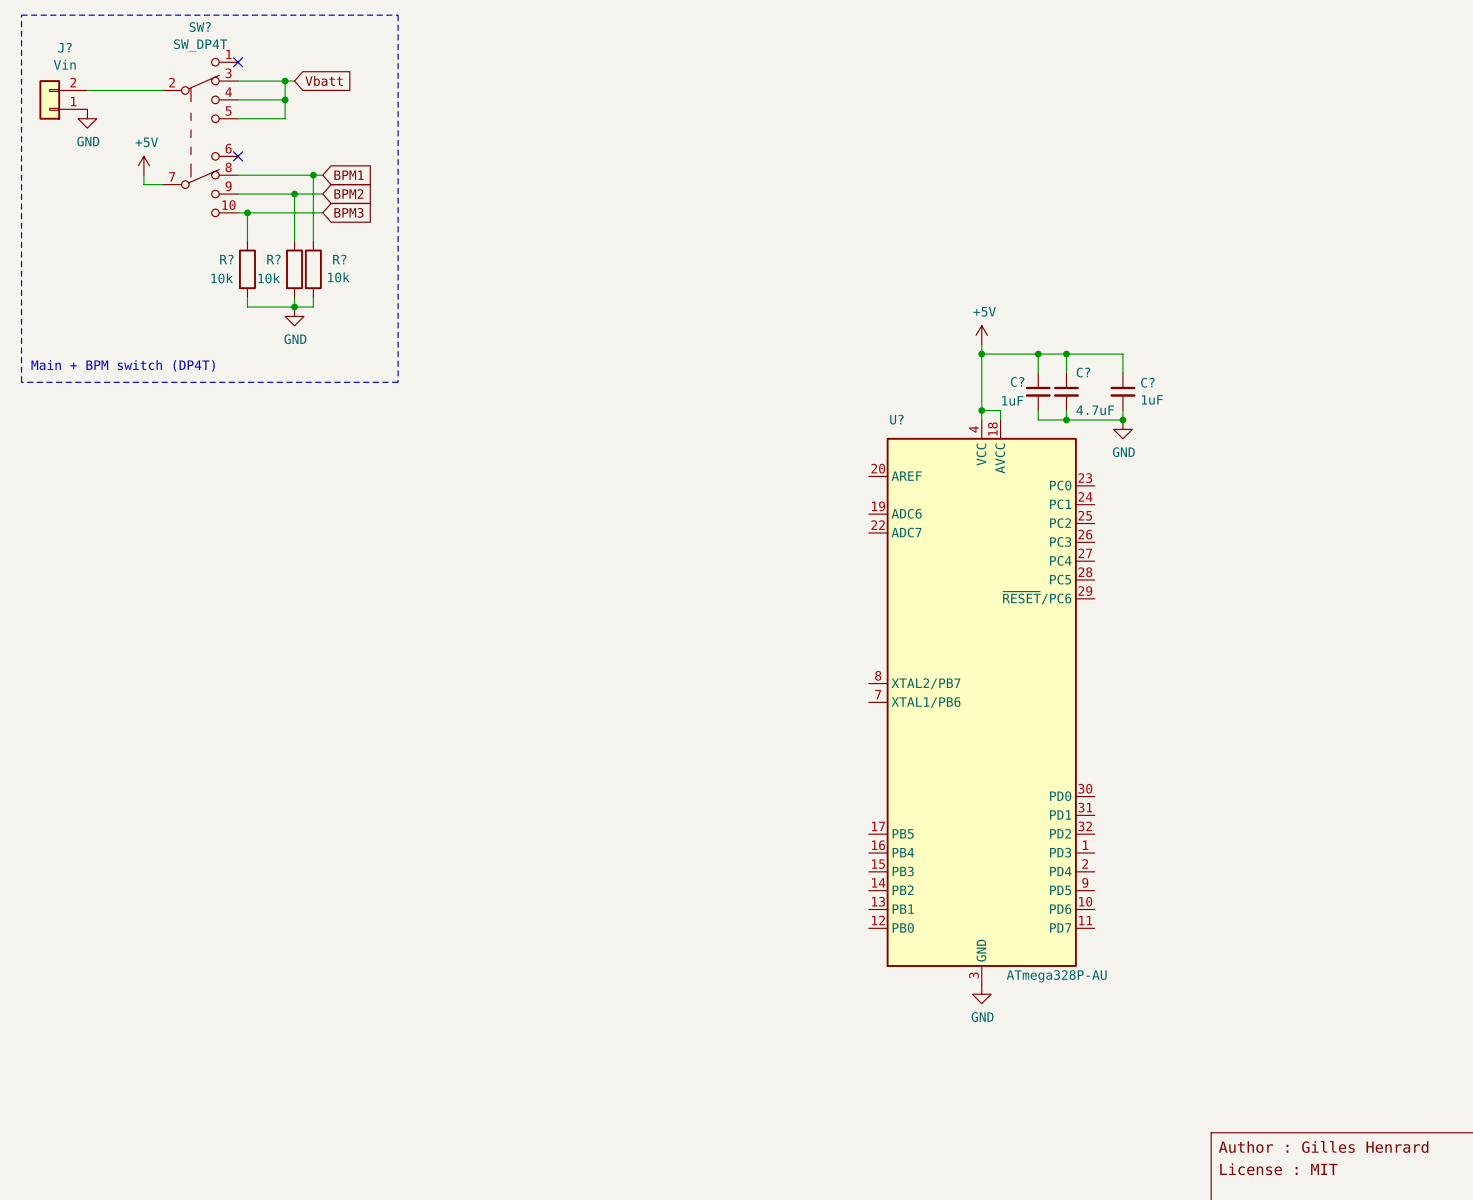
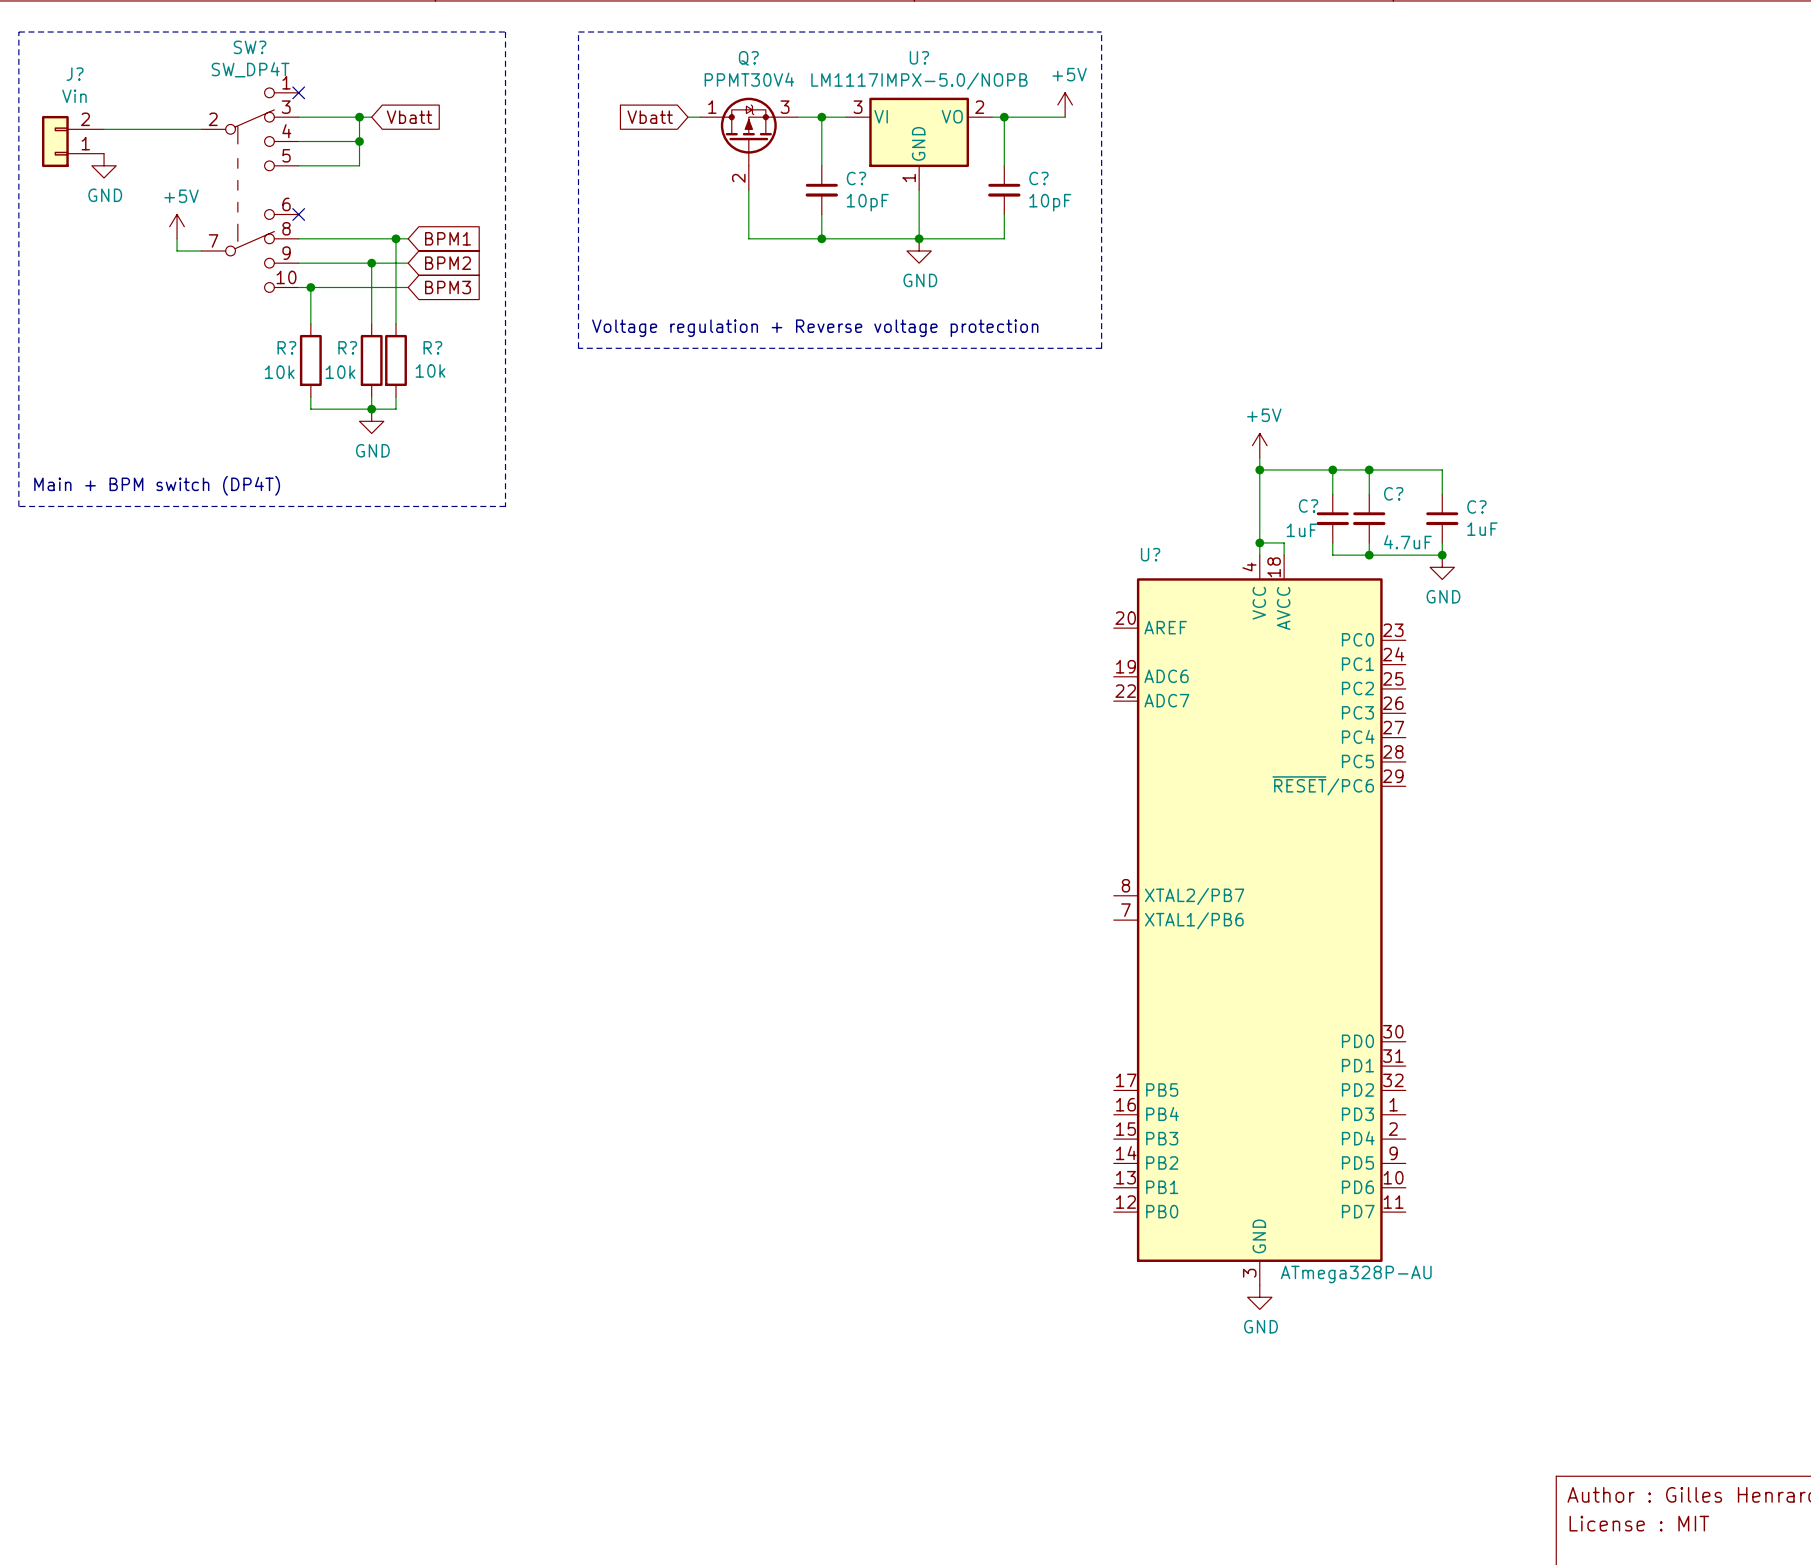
line: none -> (578, 32) (578, 348) (1101, 348) (1101, 32) (578, 32)
power symbol: none -> +5V (1065, 105)
global label: none -> Vbatt (650, 117)
wire: none -> (687, 117) (700, 117)
wire: none -> (797, 117) (846, 117)
wire: none -> (821, 117) (821, 165)
junction: none -> (821, 117)
wire: none -> (992, 117) (1065, 117)
wire: none -> (1004, 117) (1004, 165)
junction: none -> (1004, 117)
Q?: none -> PPMT30V4 (748, 143)
U?: none -> LM1117IMPX-5.0/NOPB (919, 143)
wire: none -> (748, 190) (748, 238) (1004, 238) (1004, 214)
C?: none -> 10pF (821, 190)
wire: none -> (919, 190) (919, 238)
C?: none -> 10pF (1004, 190)
wire: none -> (821, 214) (821, 238)
junction: none -> (821, 238)
junction: none -> (919, 238)
power symbol: none -> GND (919, 250)
text: none -> Voltage regulation + Reverse voltage protection (815, 328)

